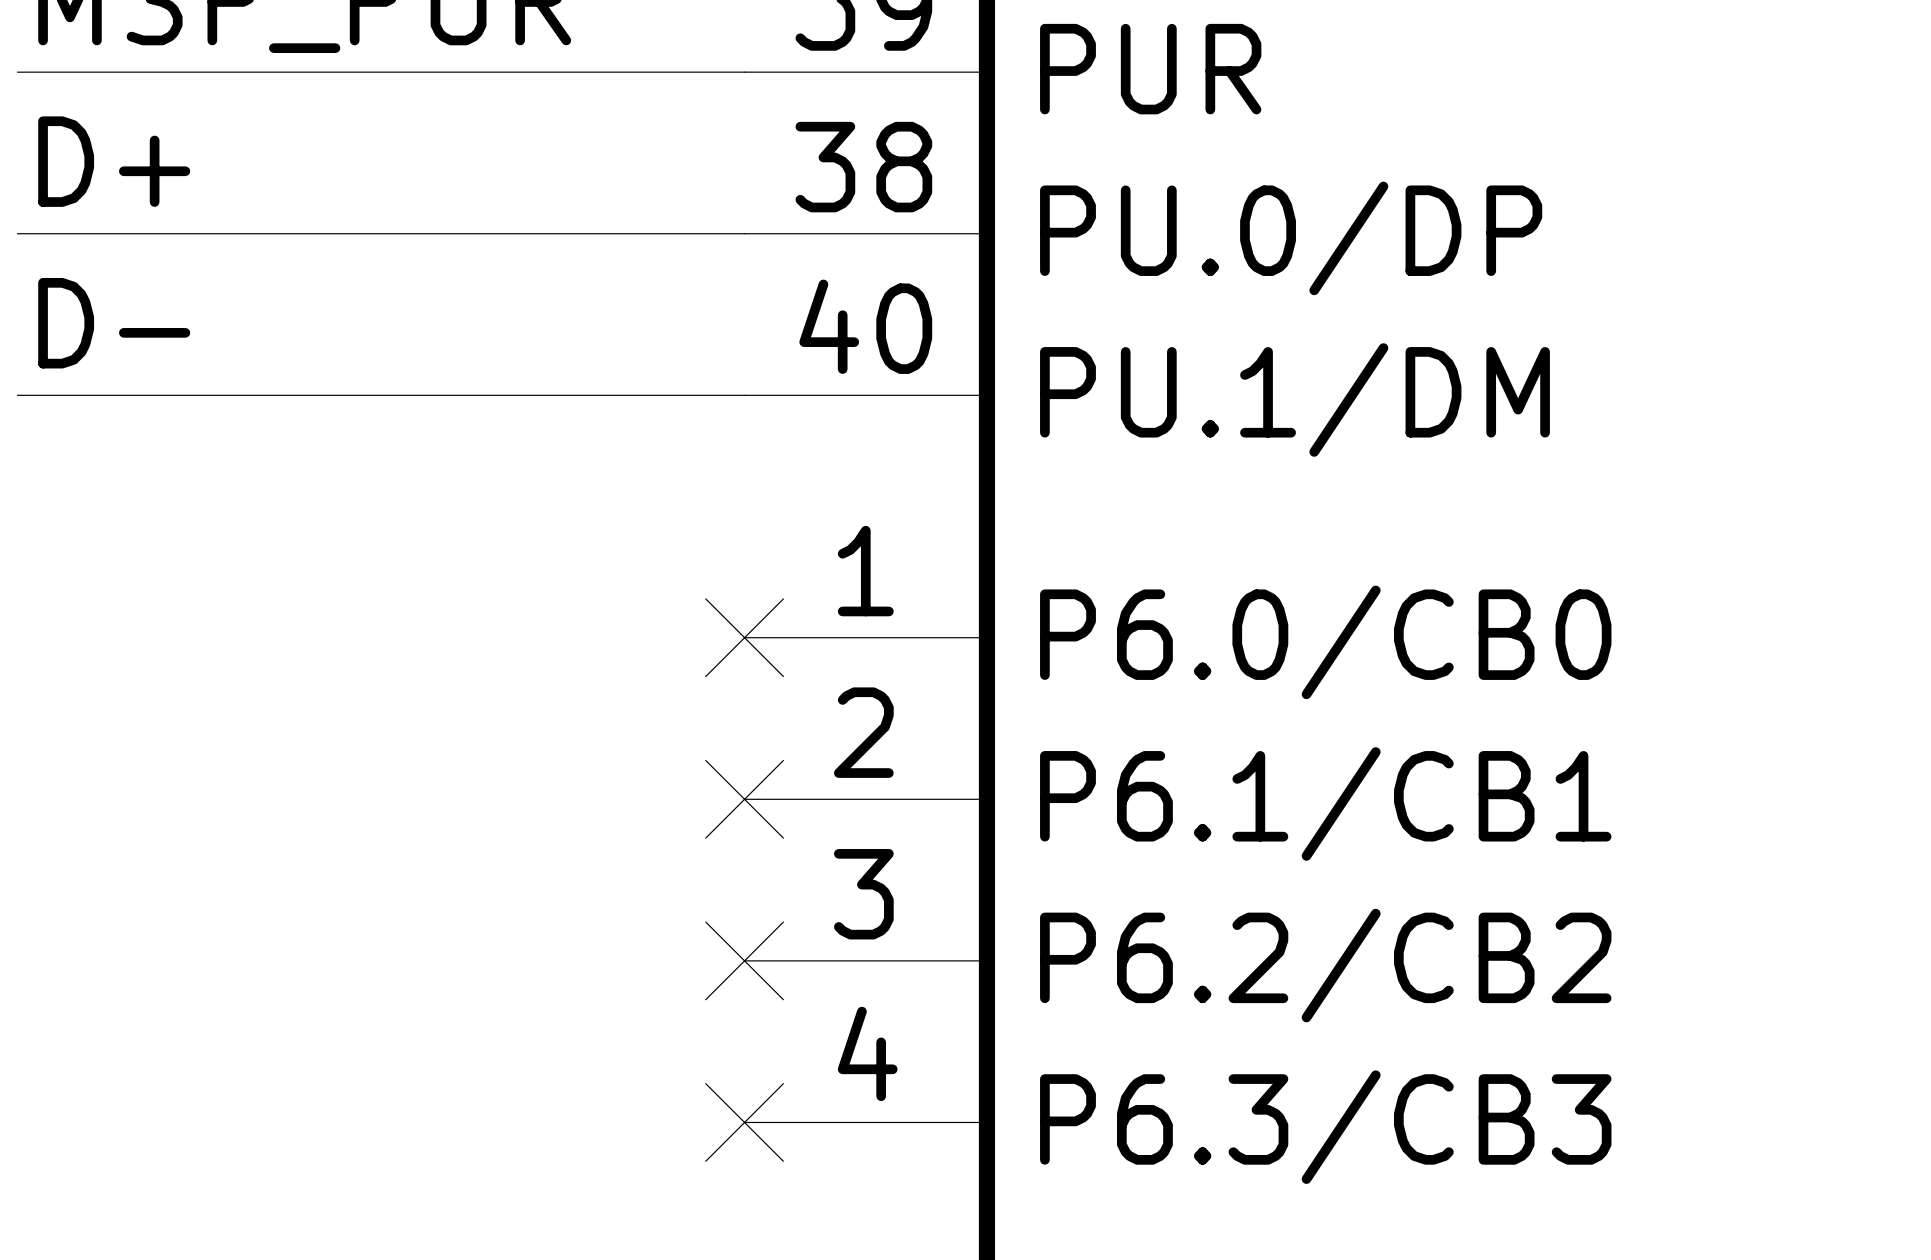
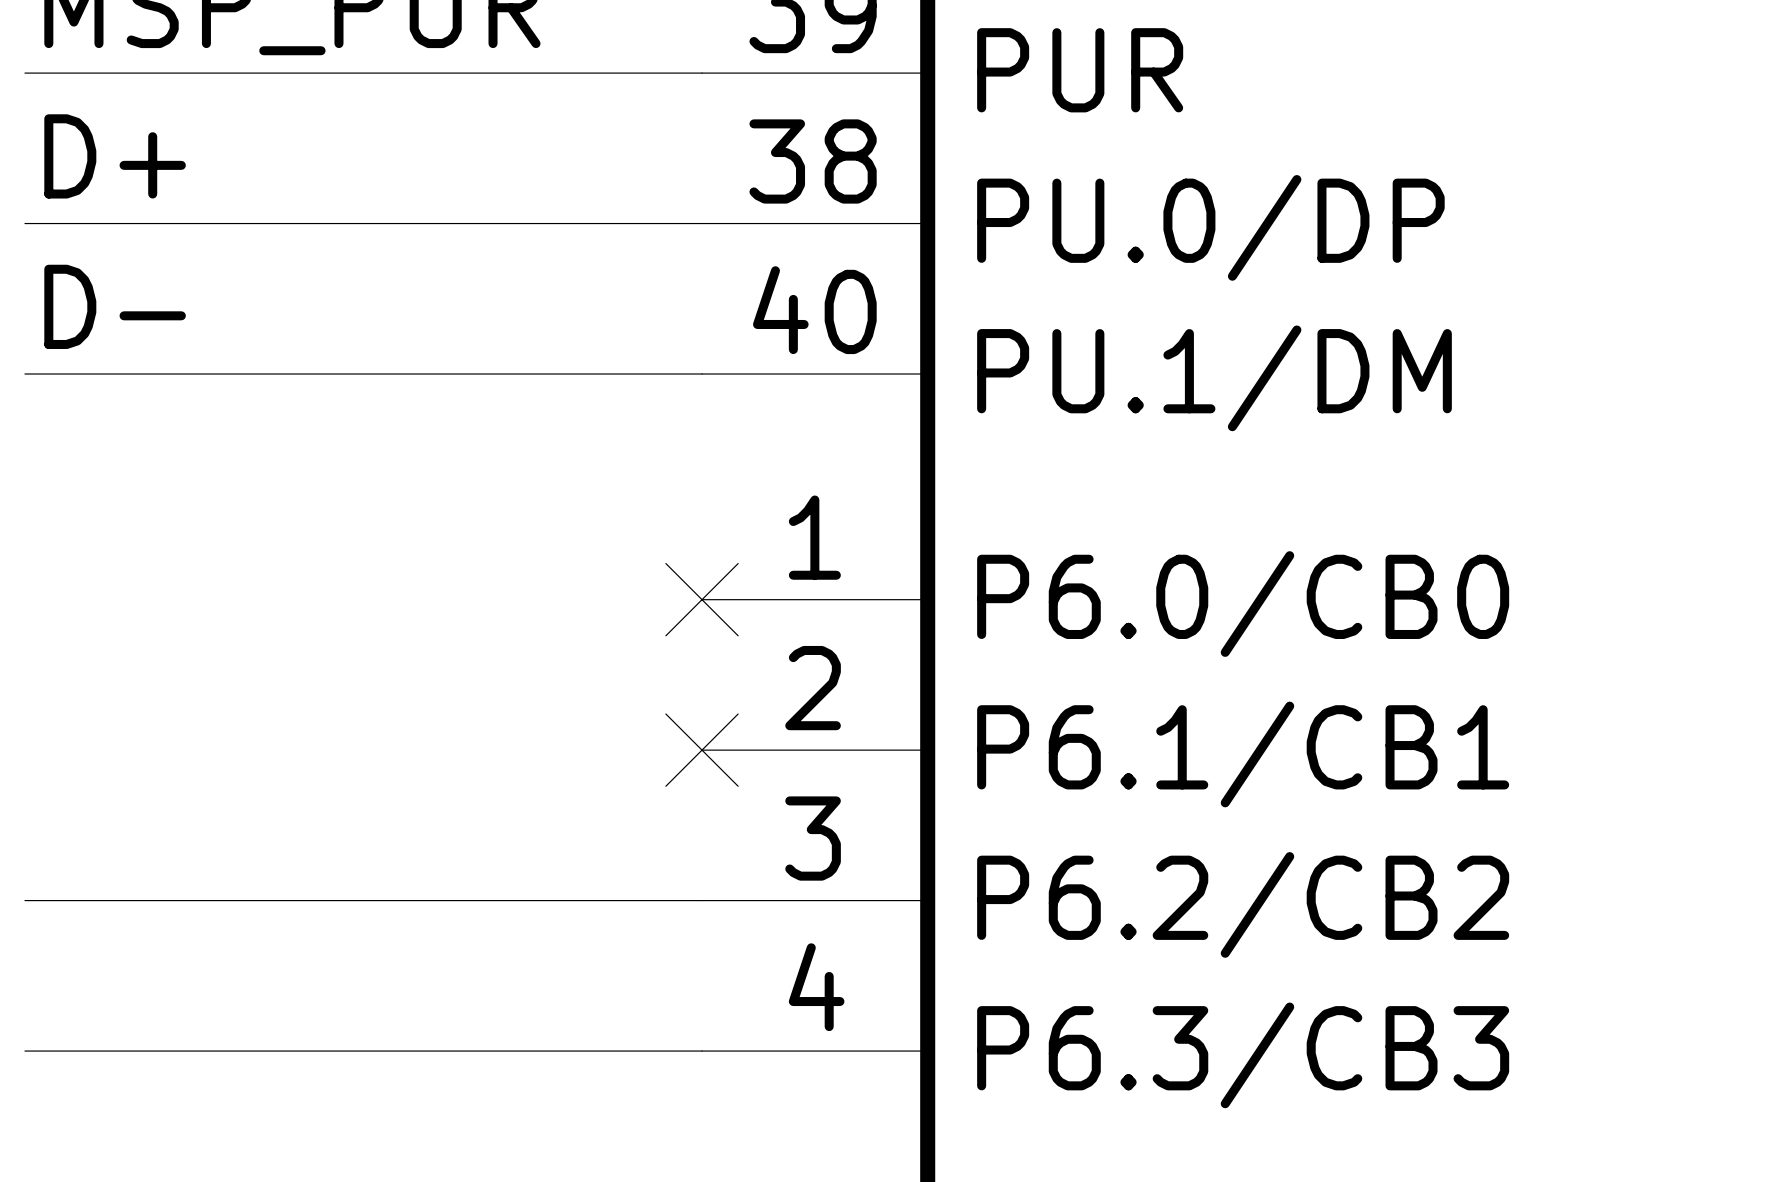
wire: none -> (24, 900) (702, 900)
no-connect mark: (744, 960) -> none
wire: none -> (24, 1051) (702, 1051)
no-connect mark: (744, 1122) -> none

